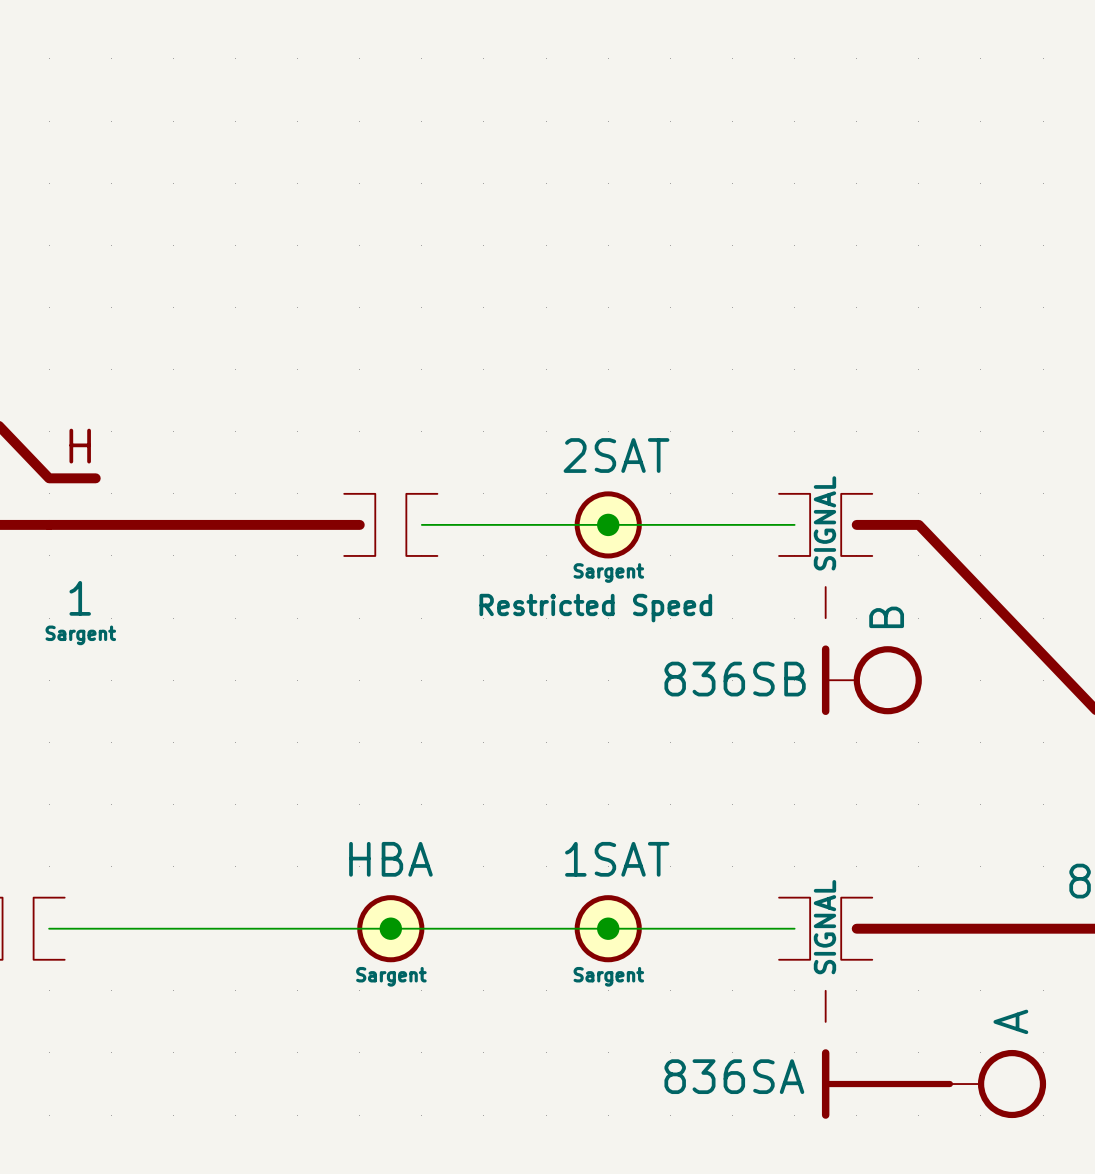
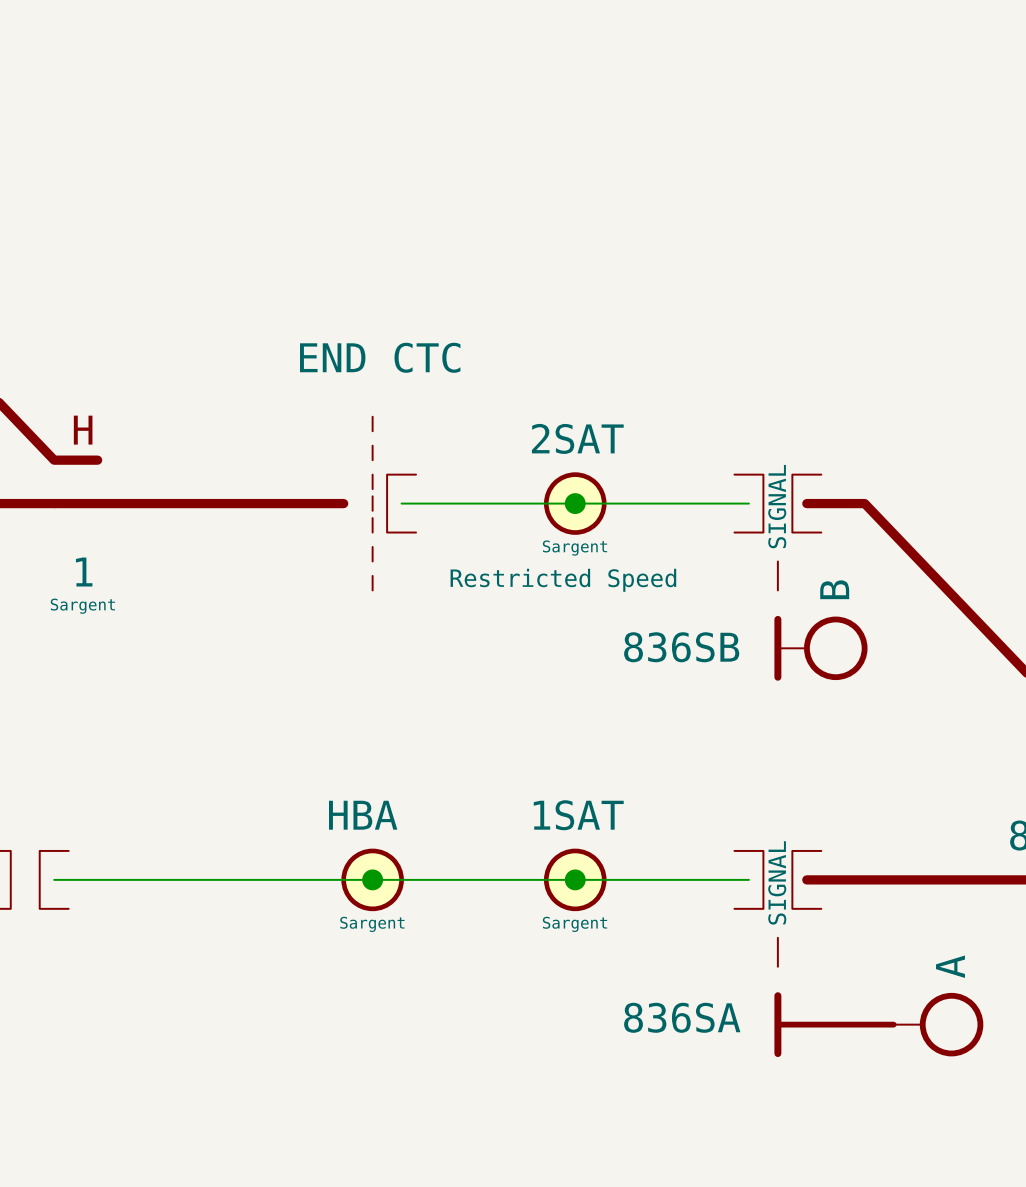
part value: none -> END CTC (380, 357)
part symbol: [344, 493, 438, 556] -> [372, 416, 417, 591]

